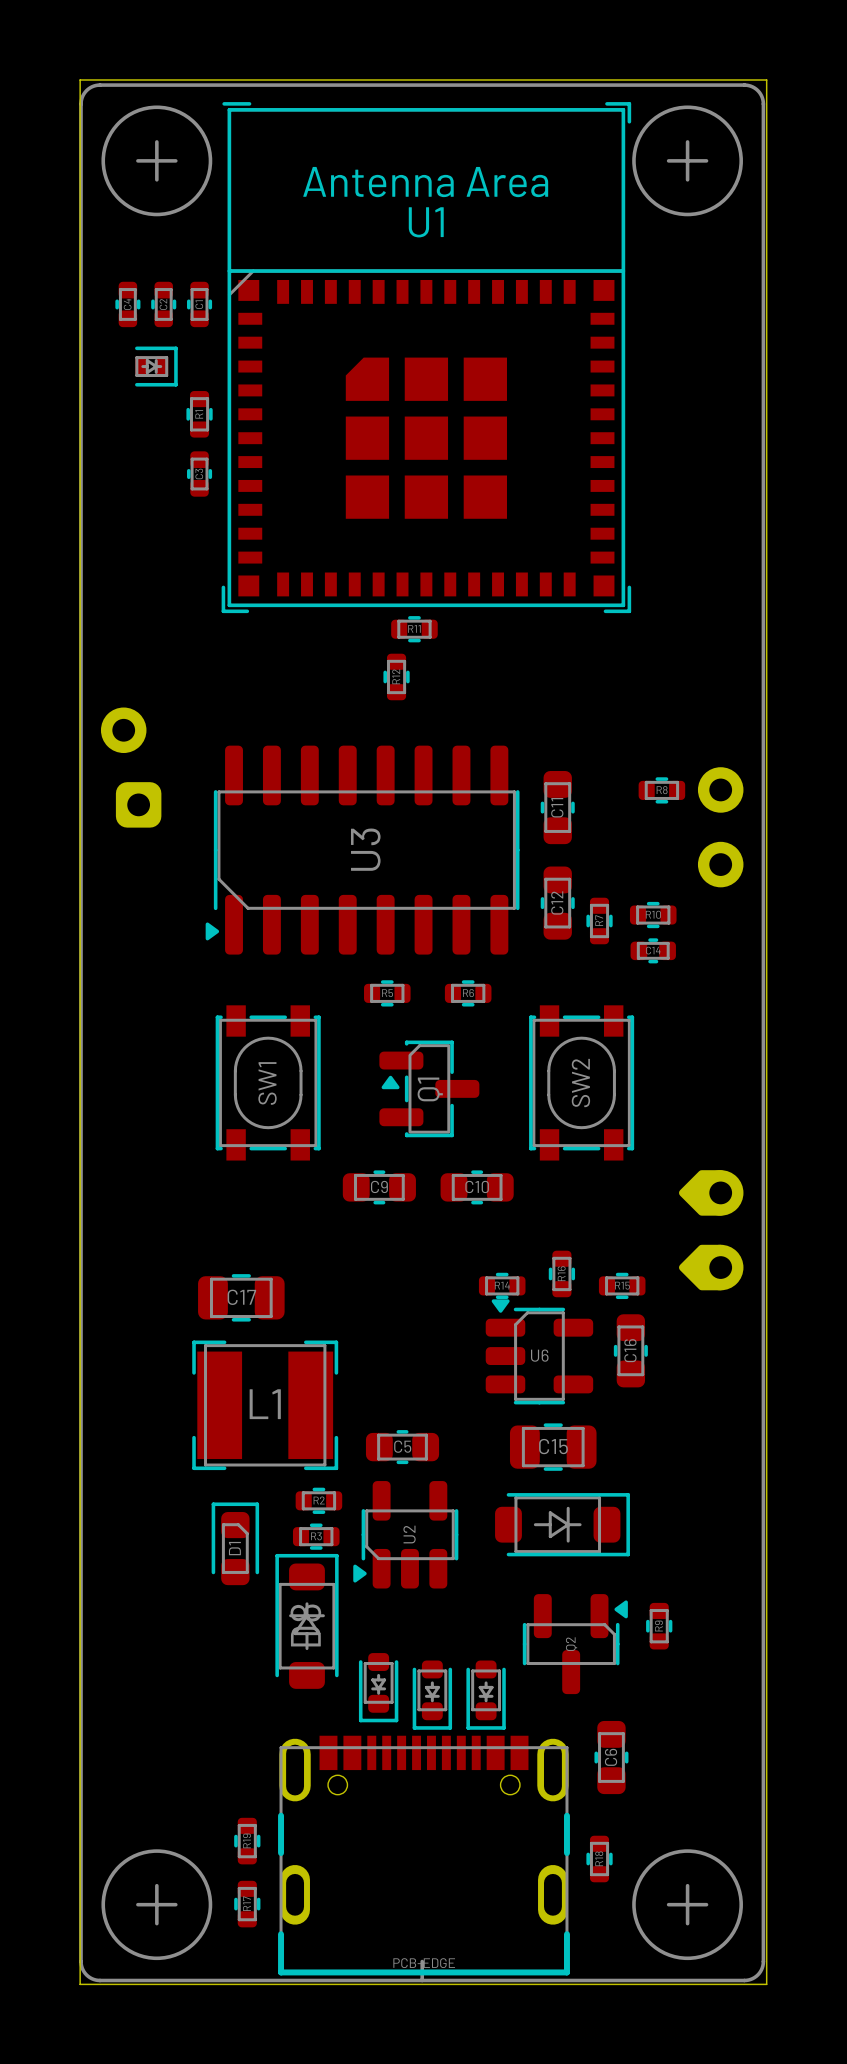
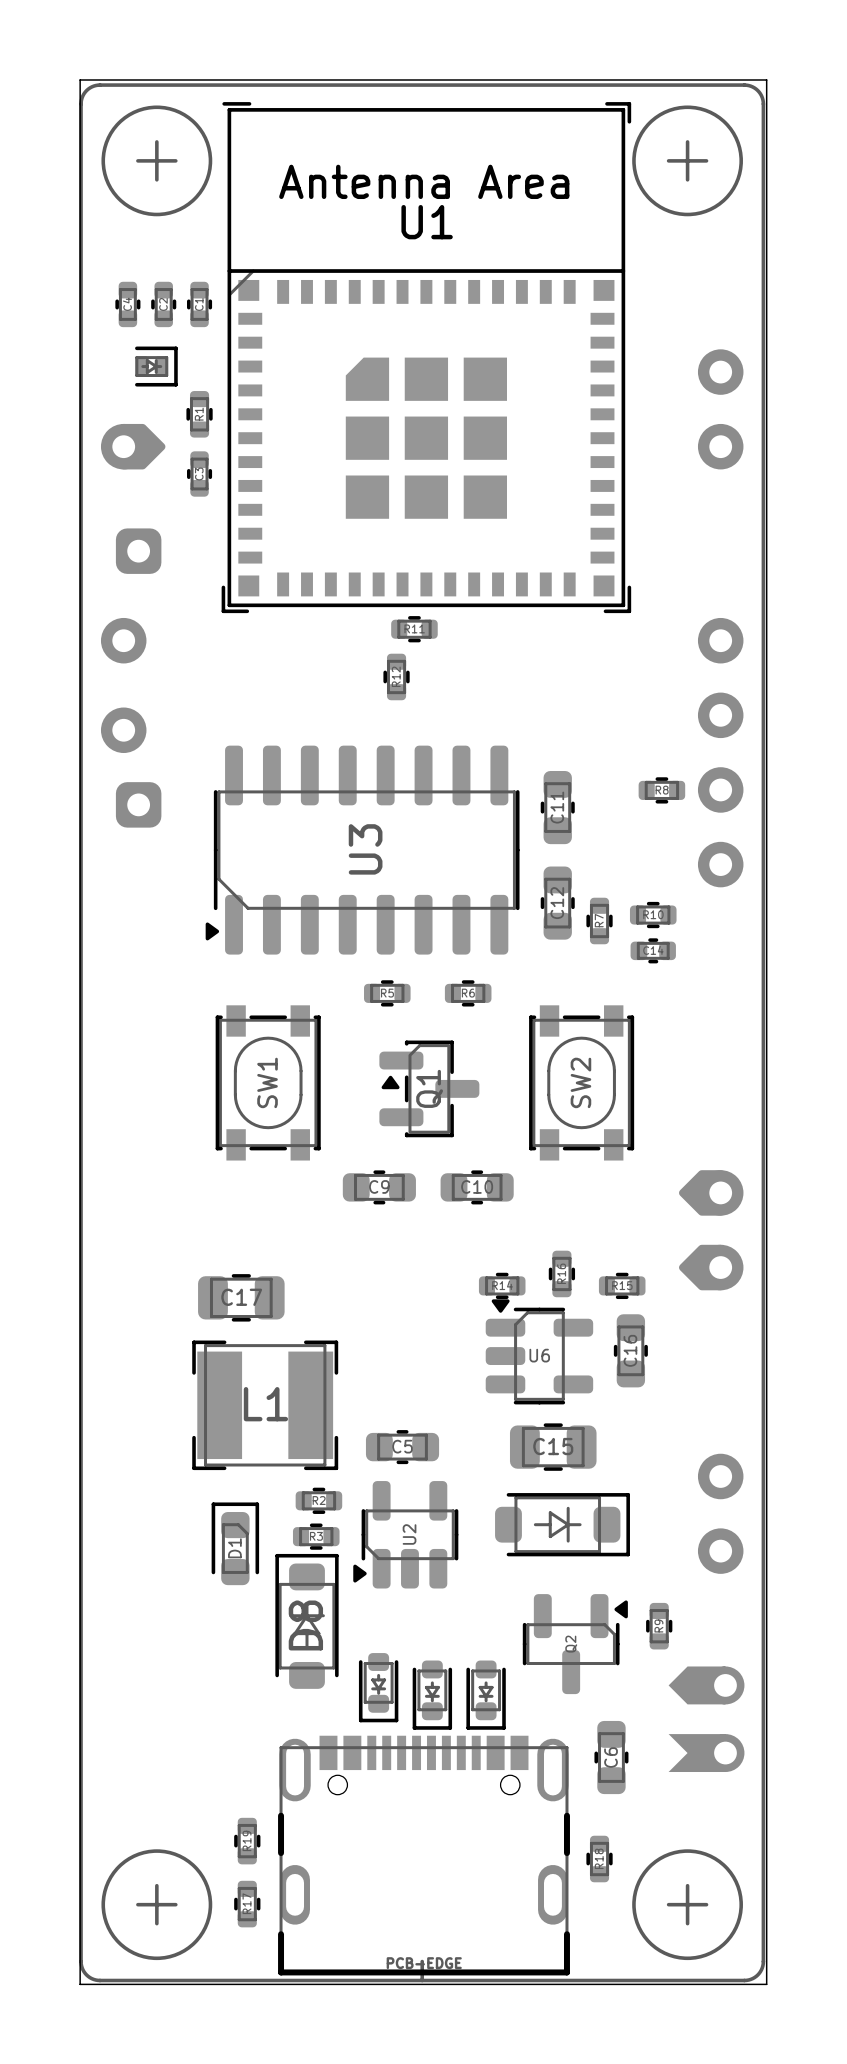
part footprint: [79, 83, 766, 1983] -> [79, 83, 766, 1983]

